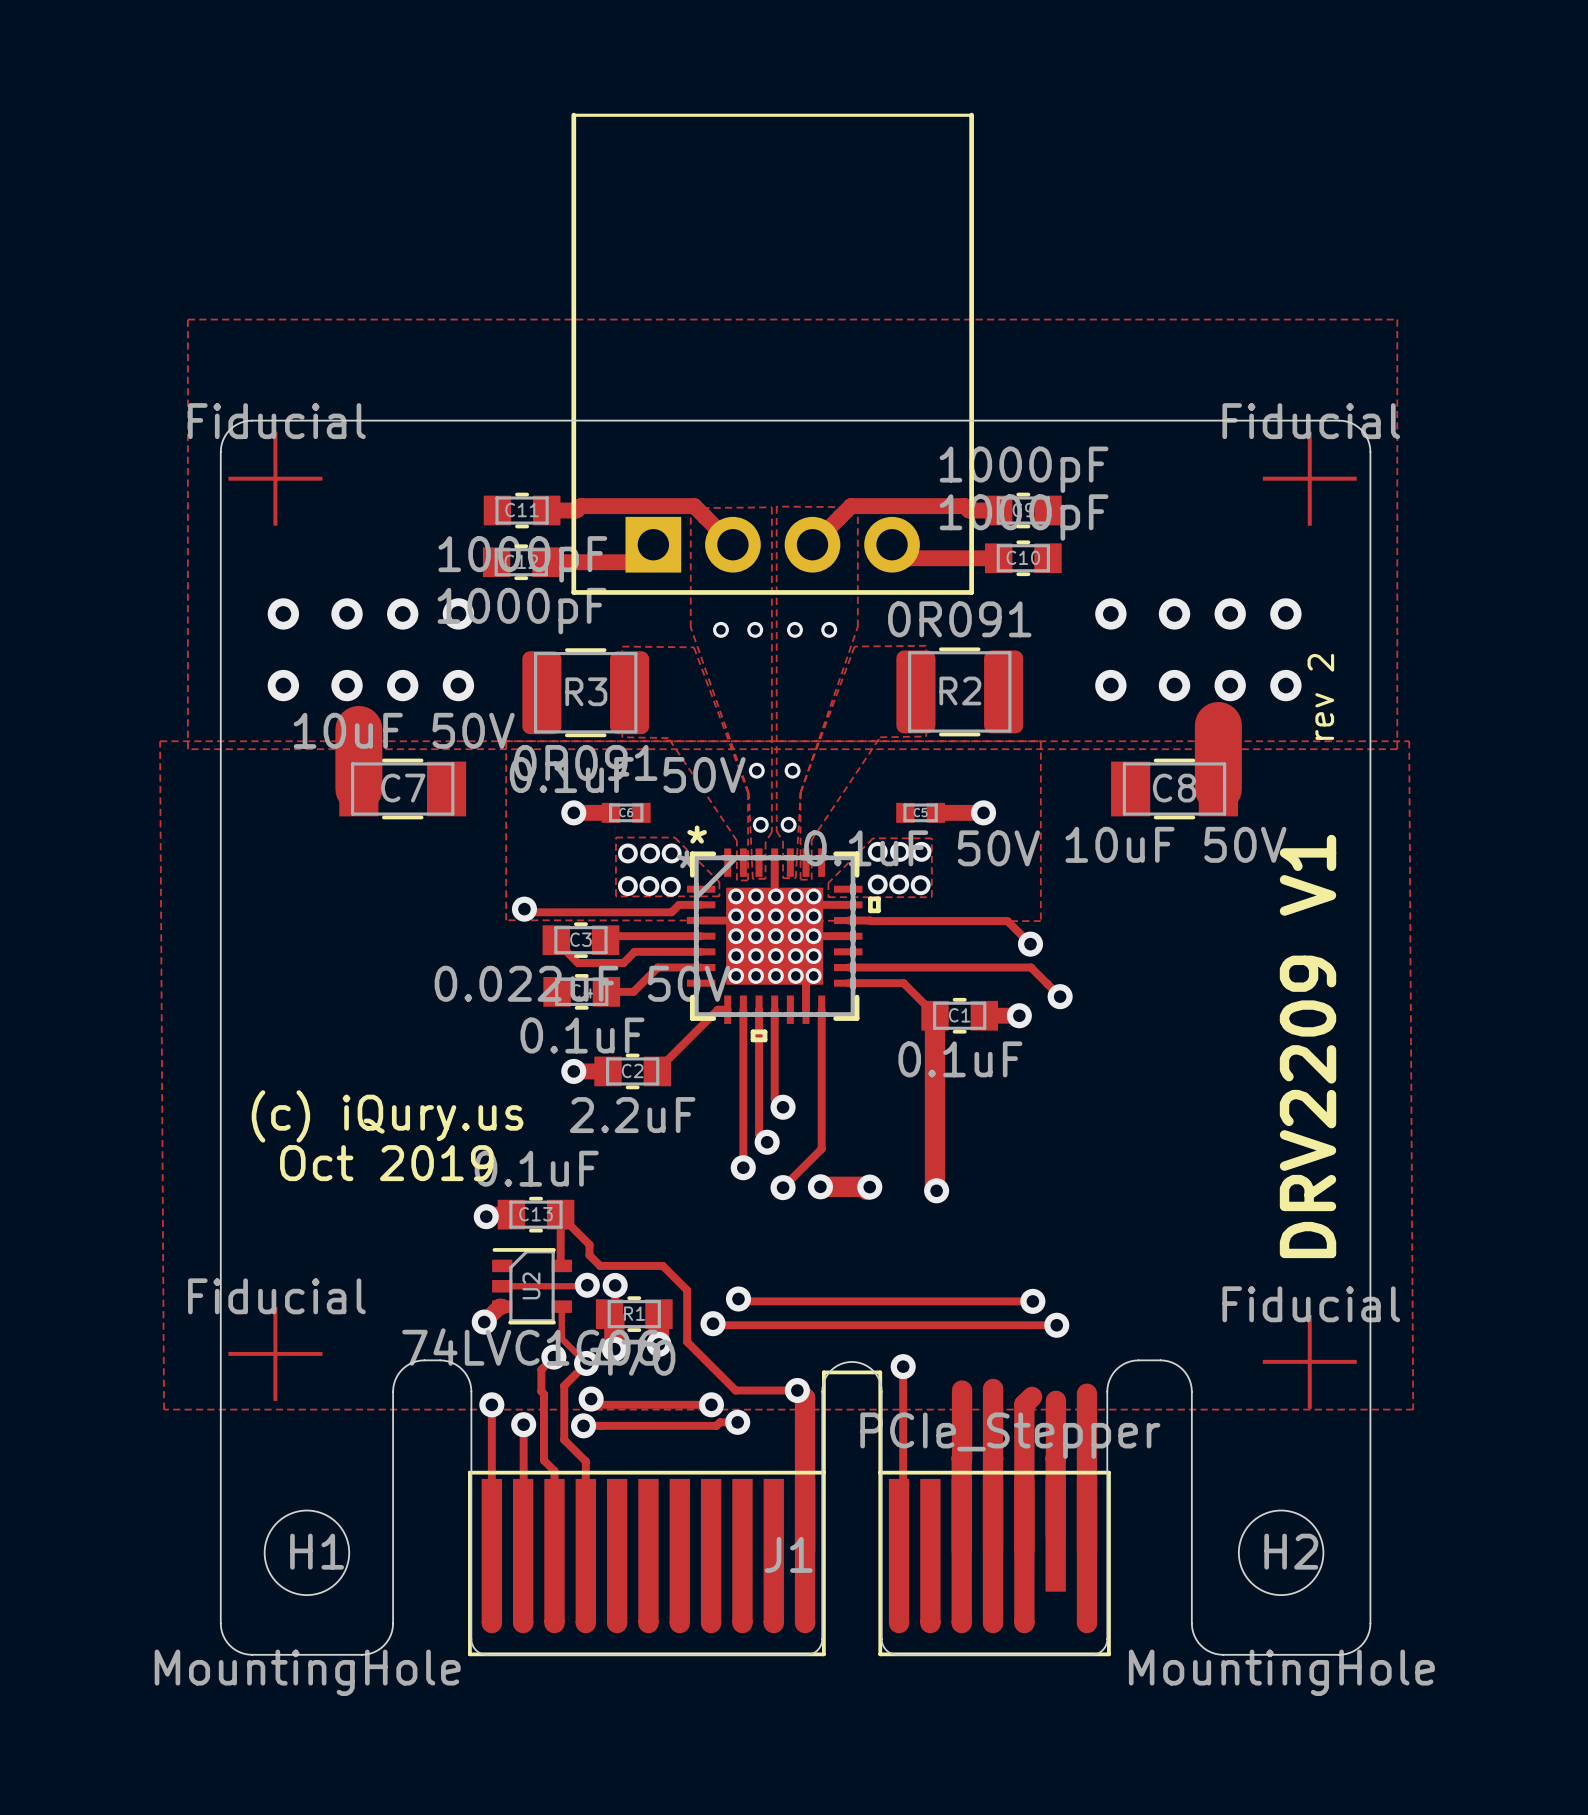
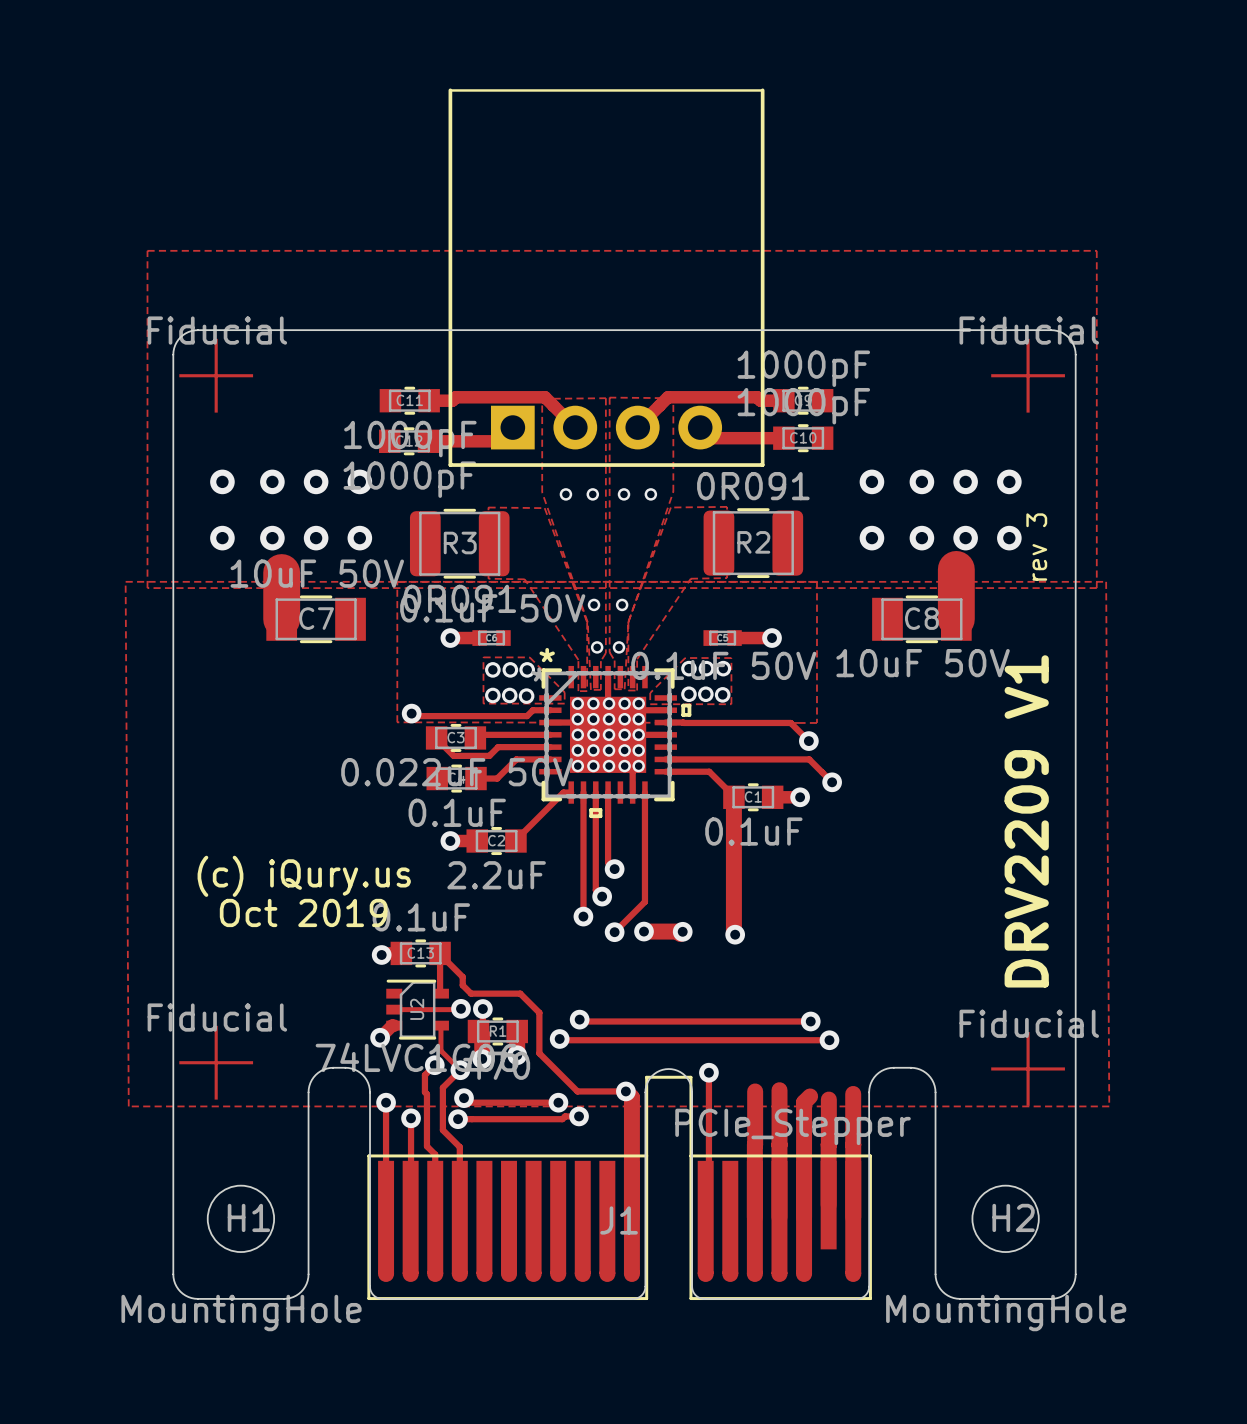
text: rev 2 (1320, 696) -> rev 3 (1036, 547)

